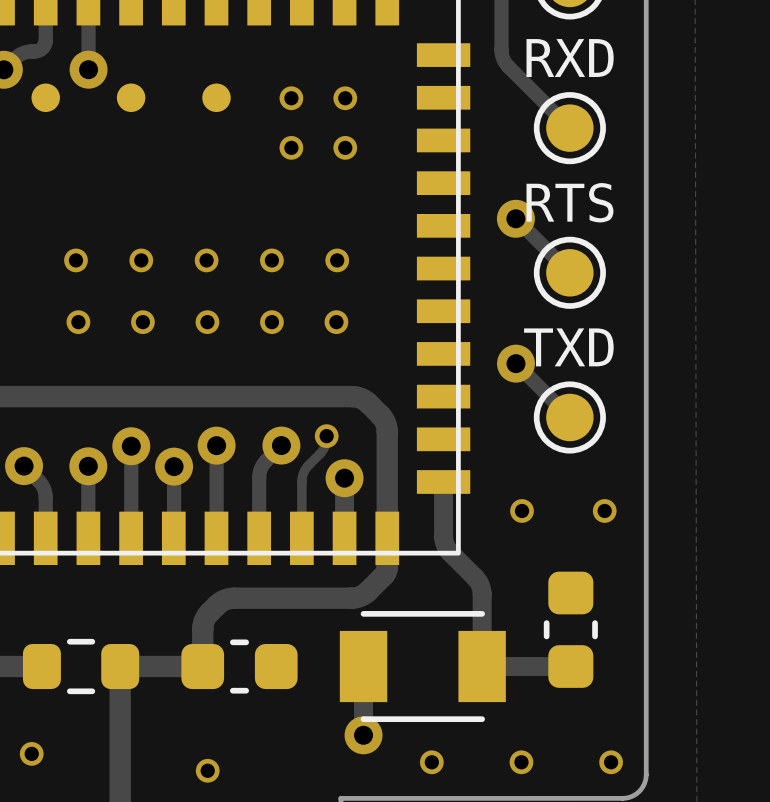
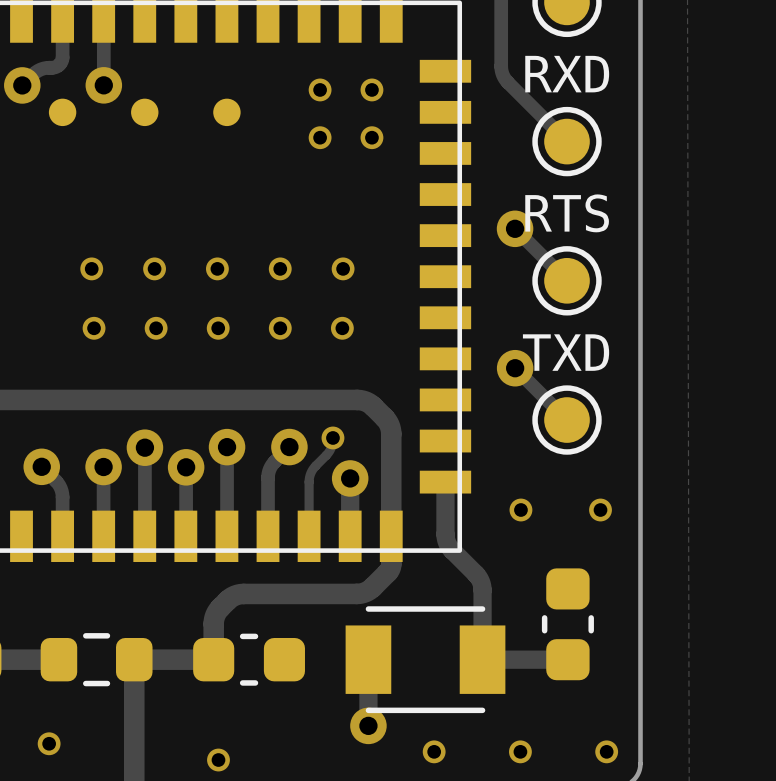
via: none -> (320, 89)
via: none -> (371, 89)
via: (291, 98) -> none
via: (345, 98) -> none
via: none -> (320, 137)
via: none -> (371, 137)
via: (291, 147) -> none
via: (345, 147) -> none

